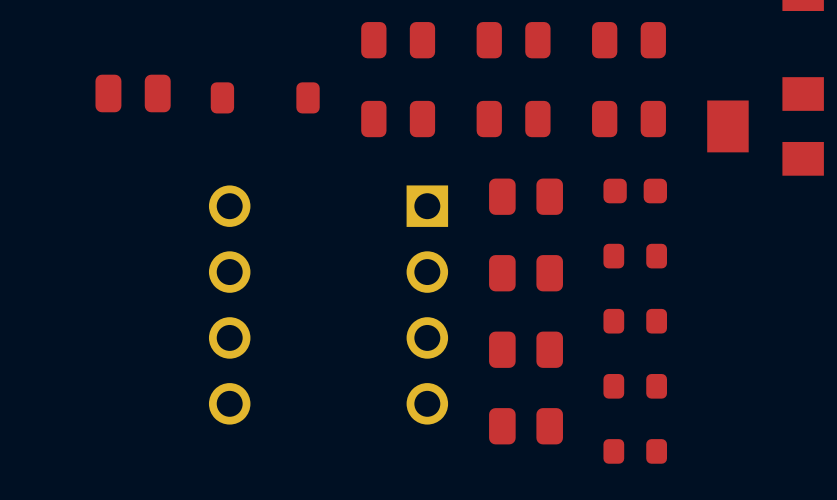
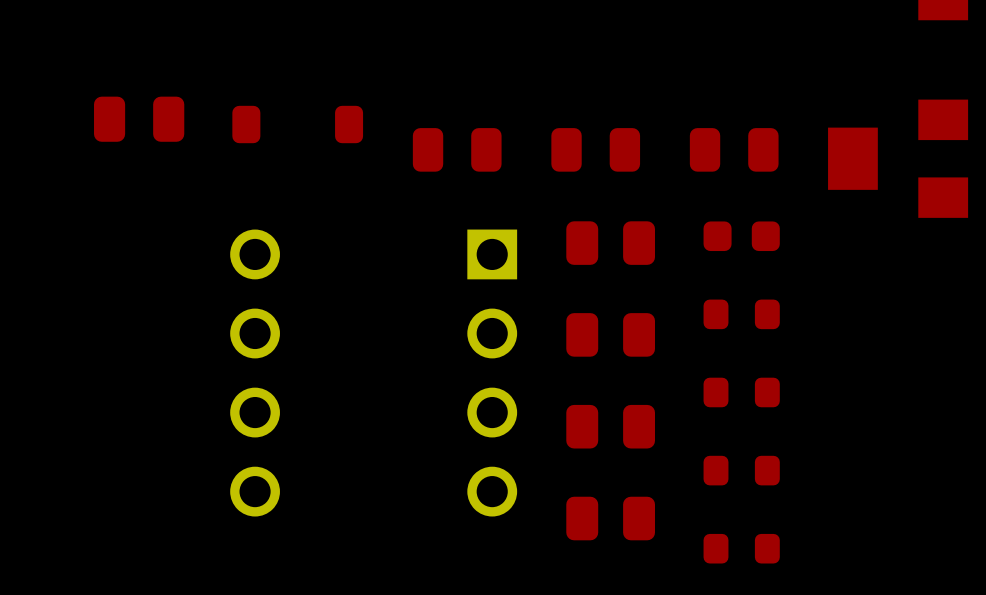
part: (398, 40) -> none
part: (513, 40) -> none
part: (628, 40) -> none

